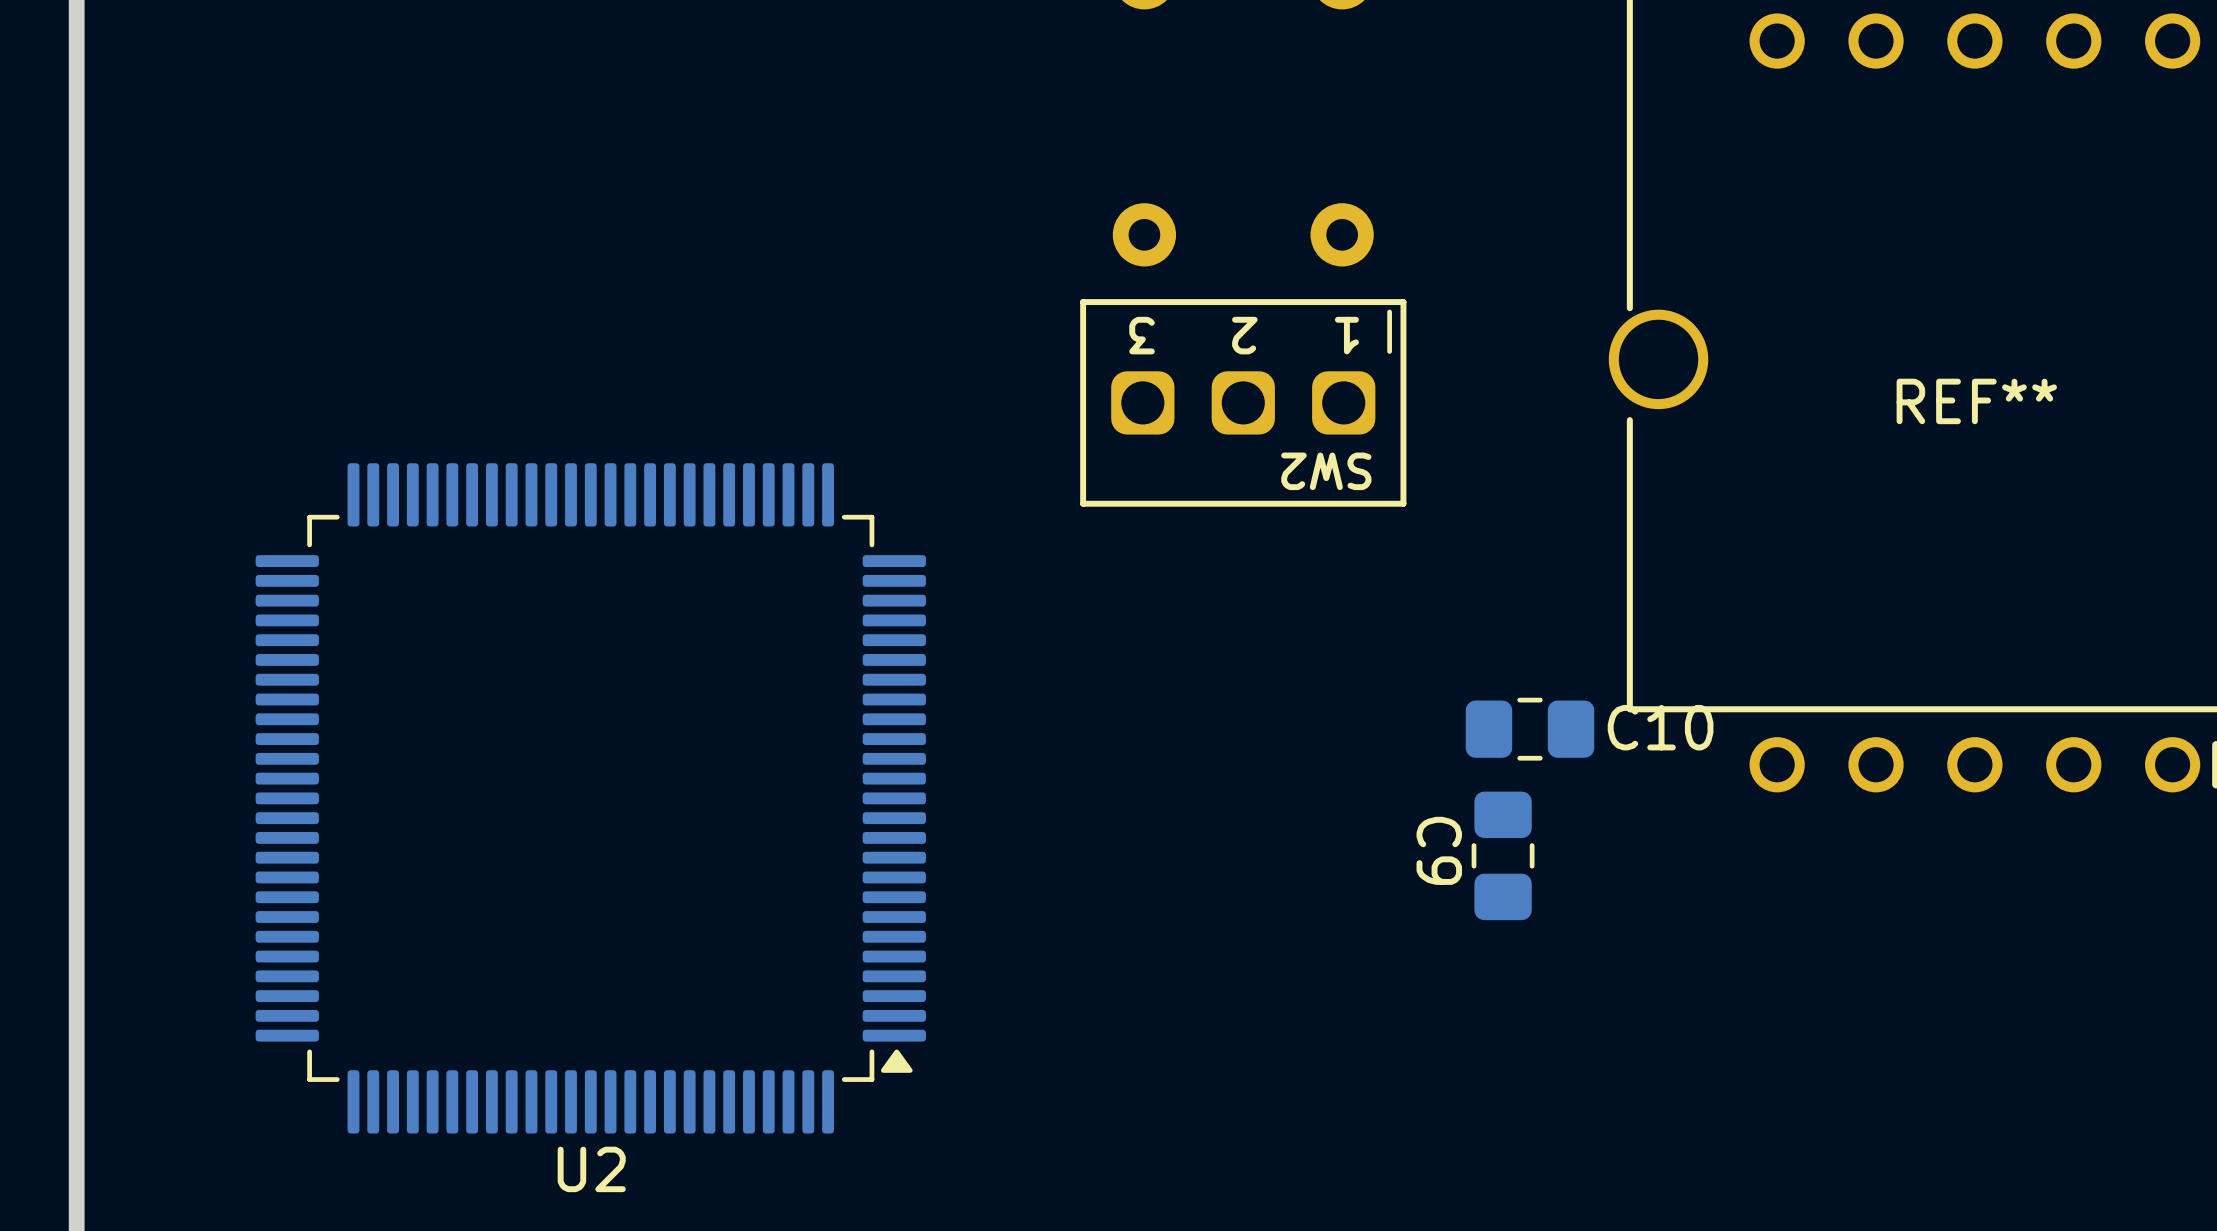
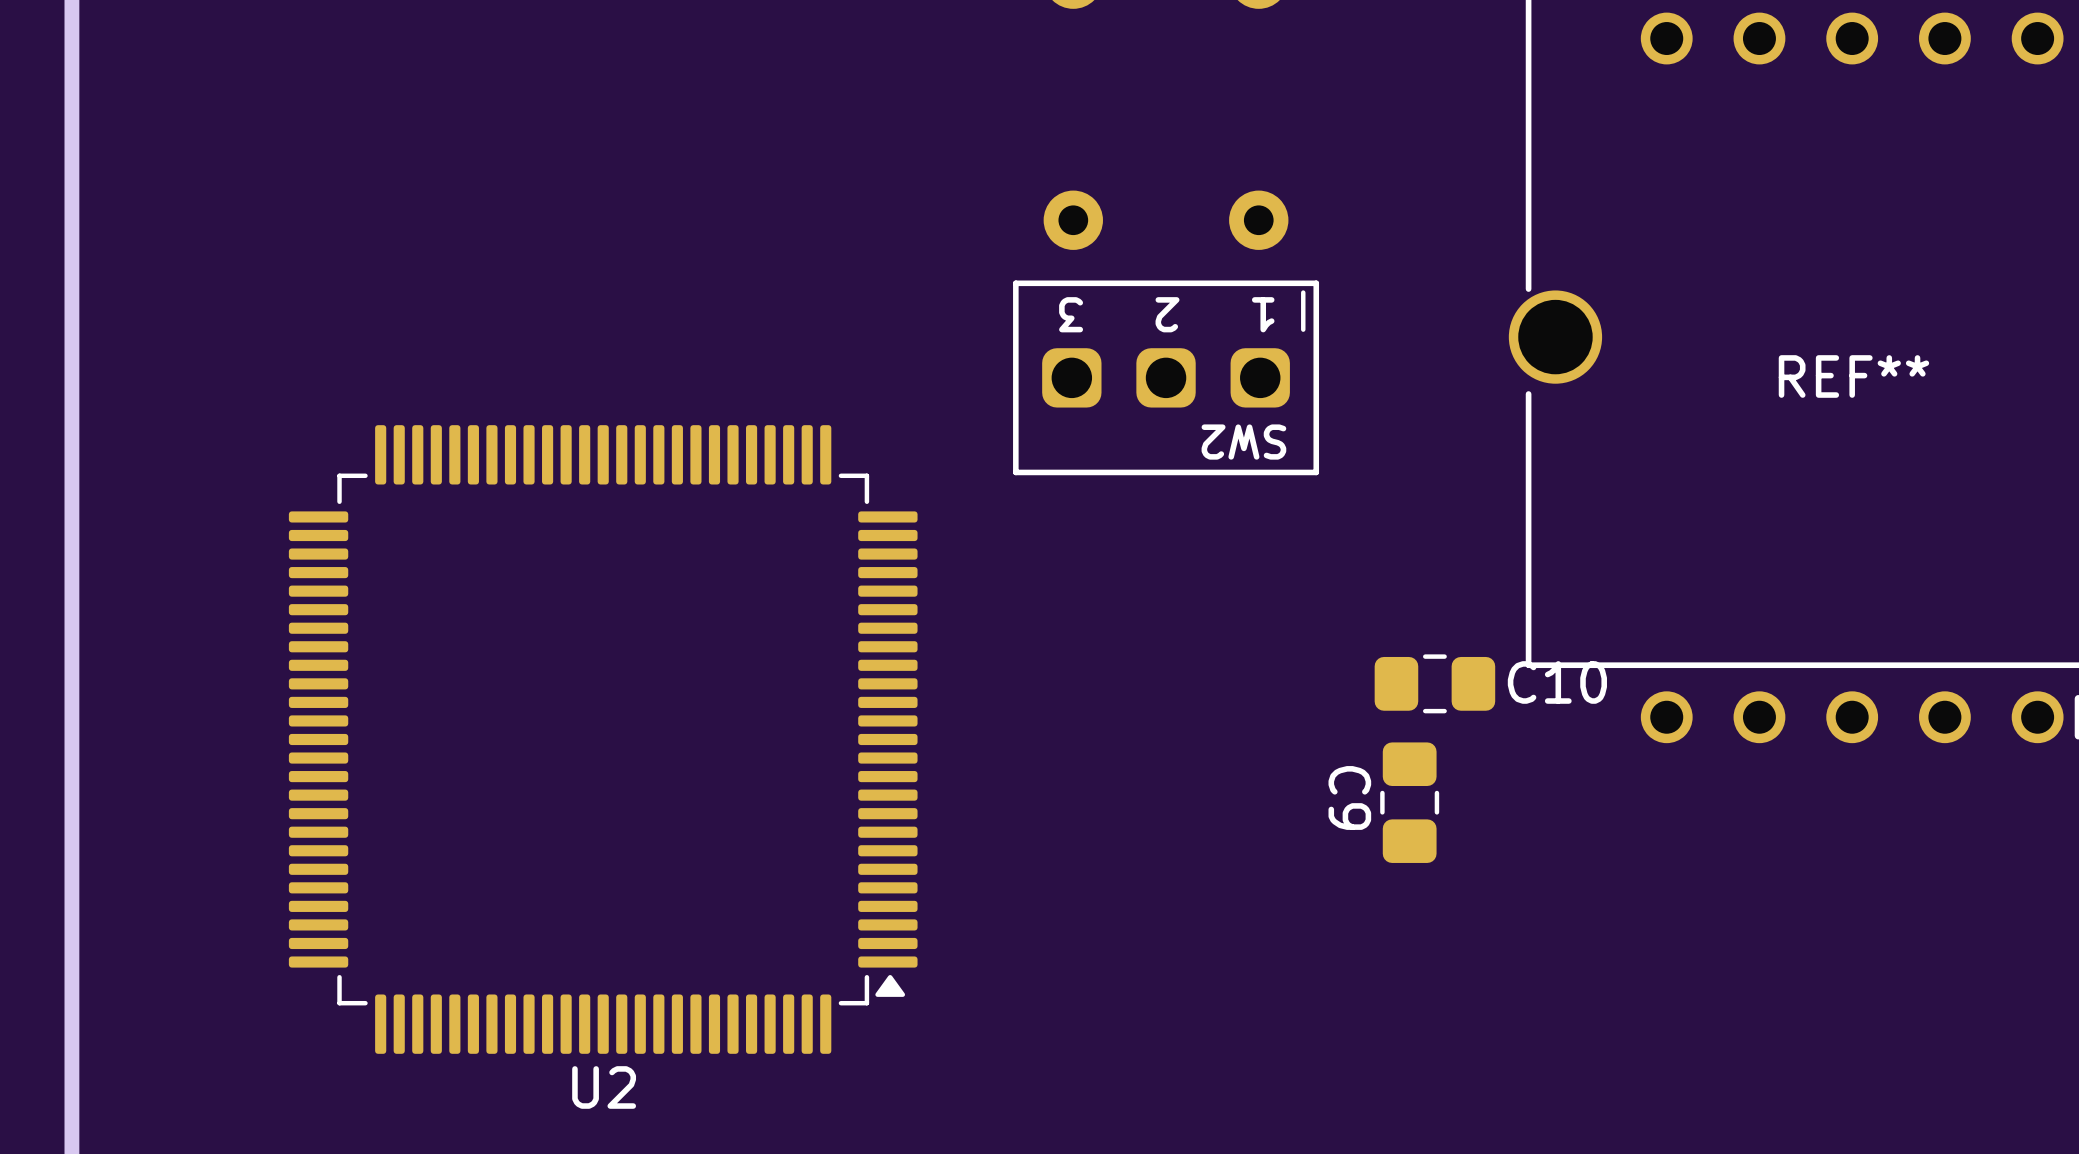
U2 position: (590, 798) -> (603, 739)

